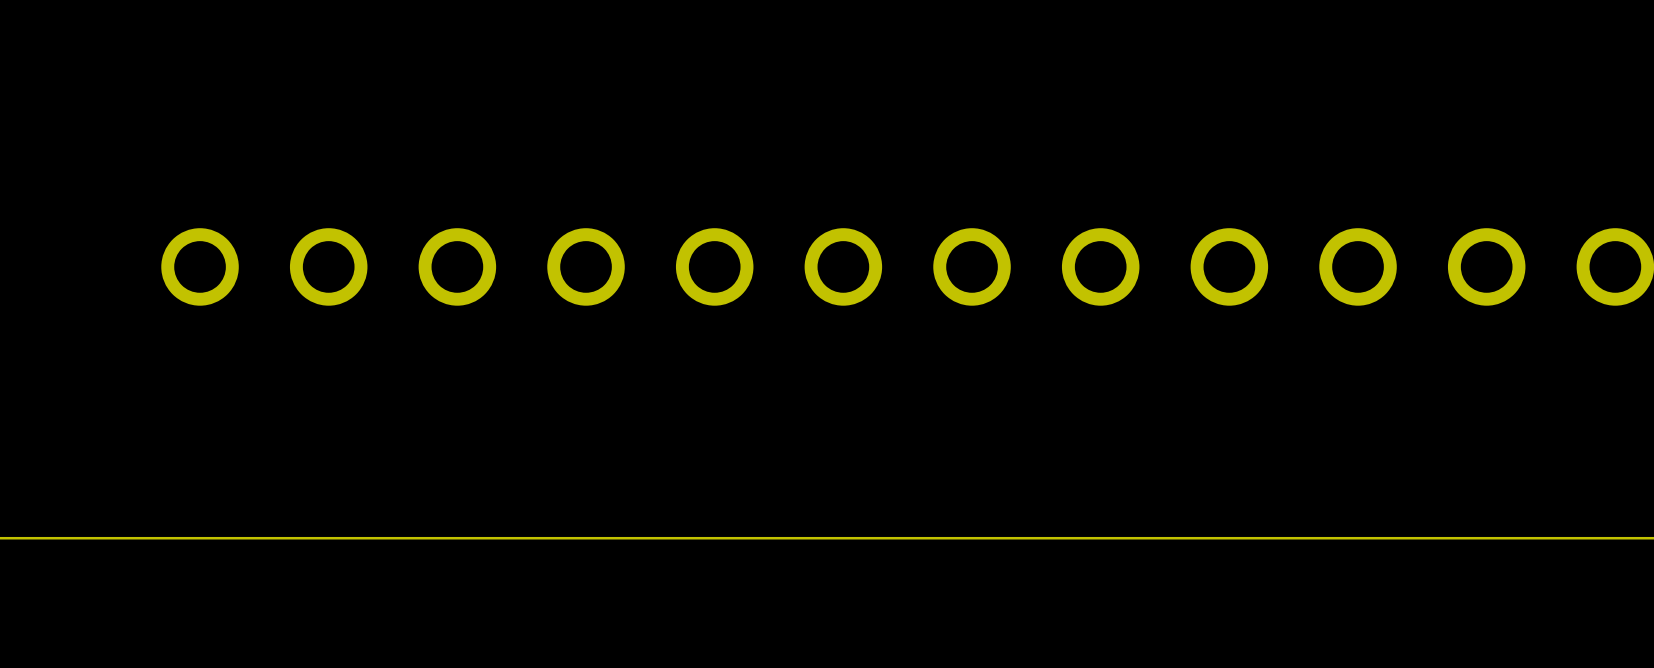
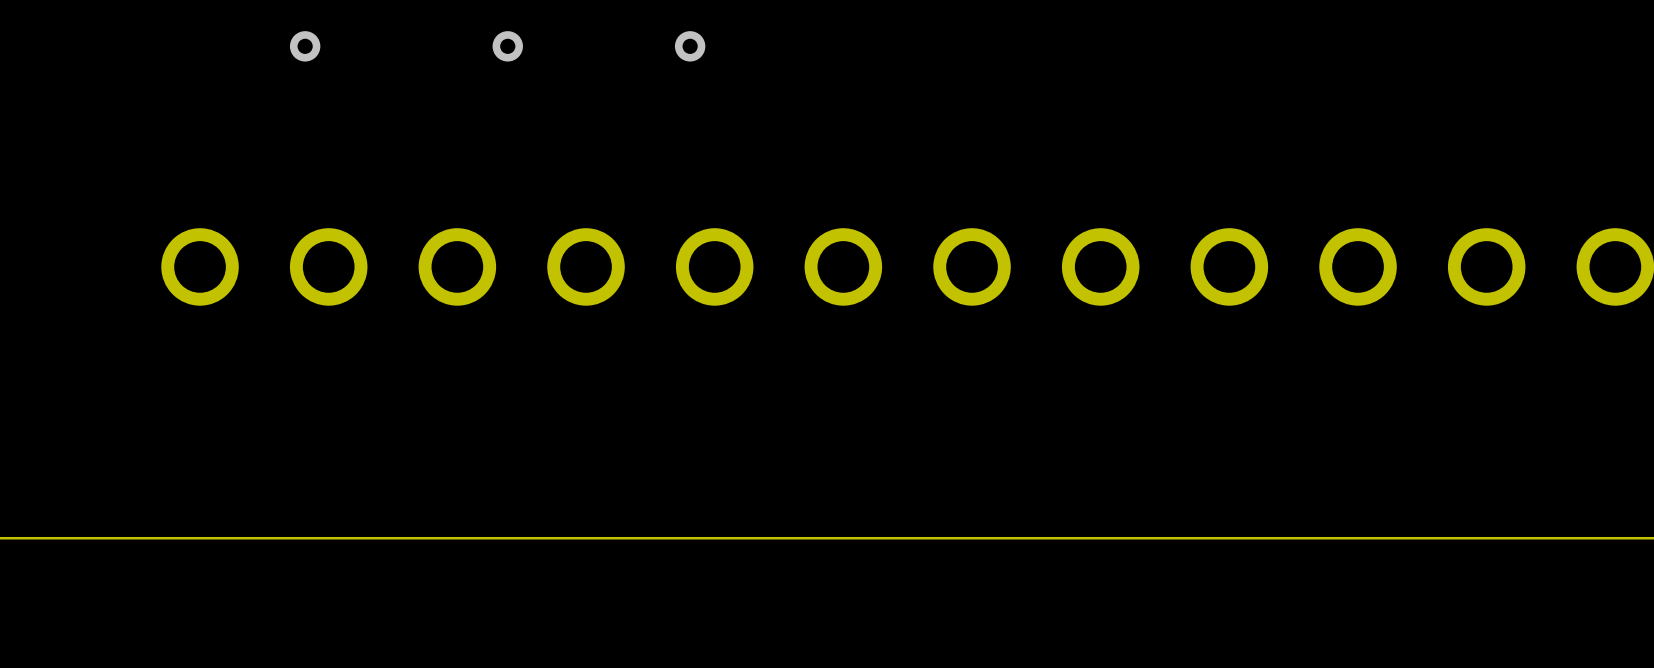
via: none -> (305, 46)
via: none -> (507, 46)
via: none -> (690, 46)

